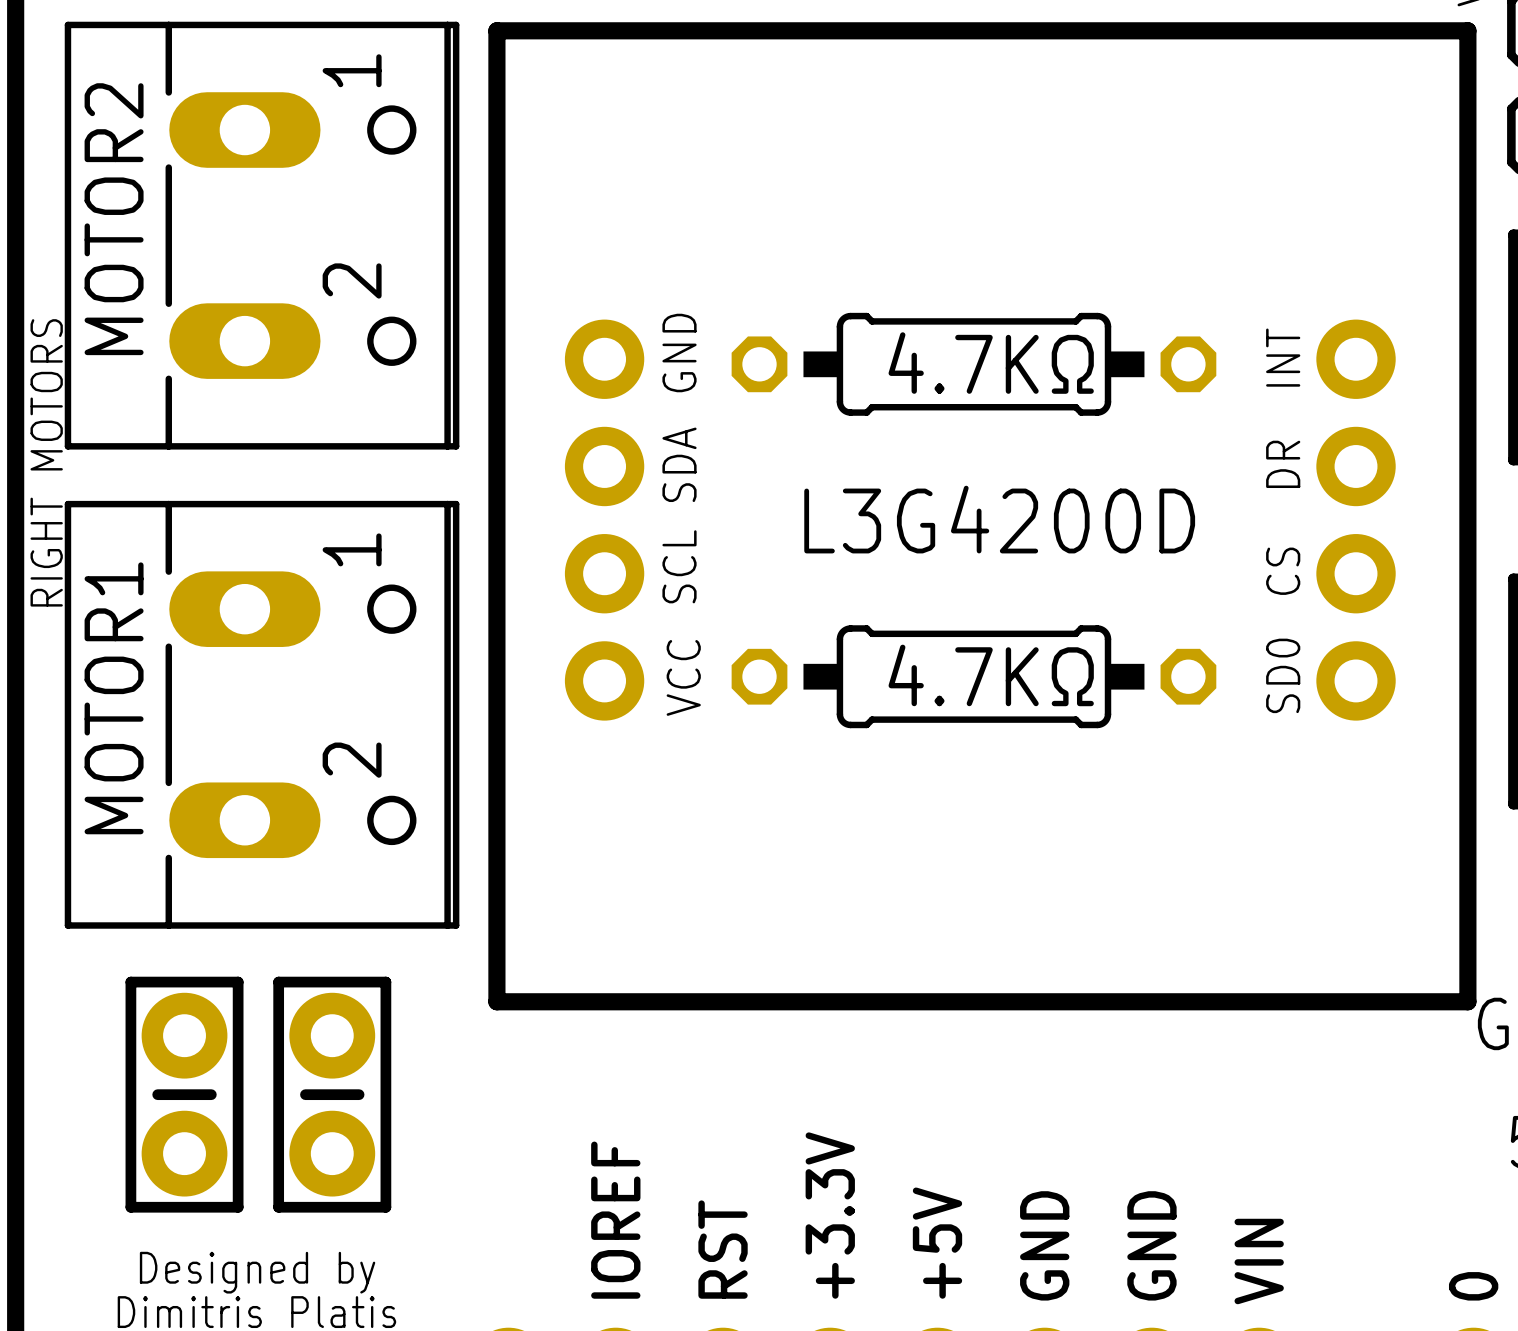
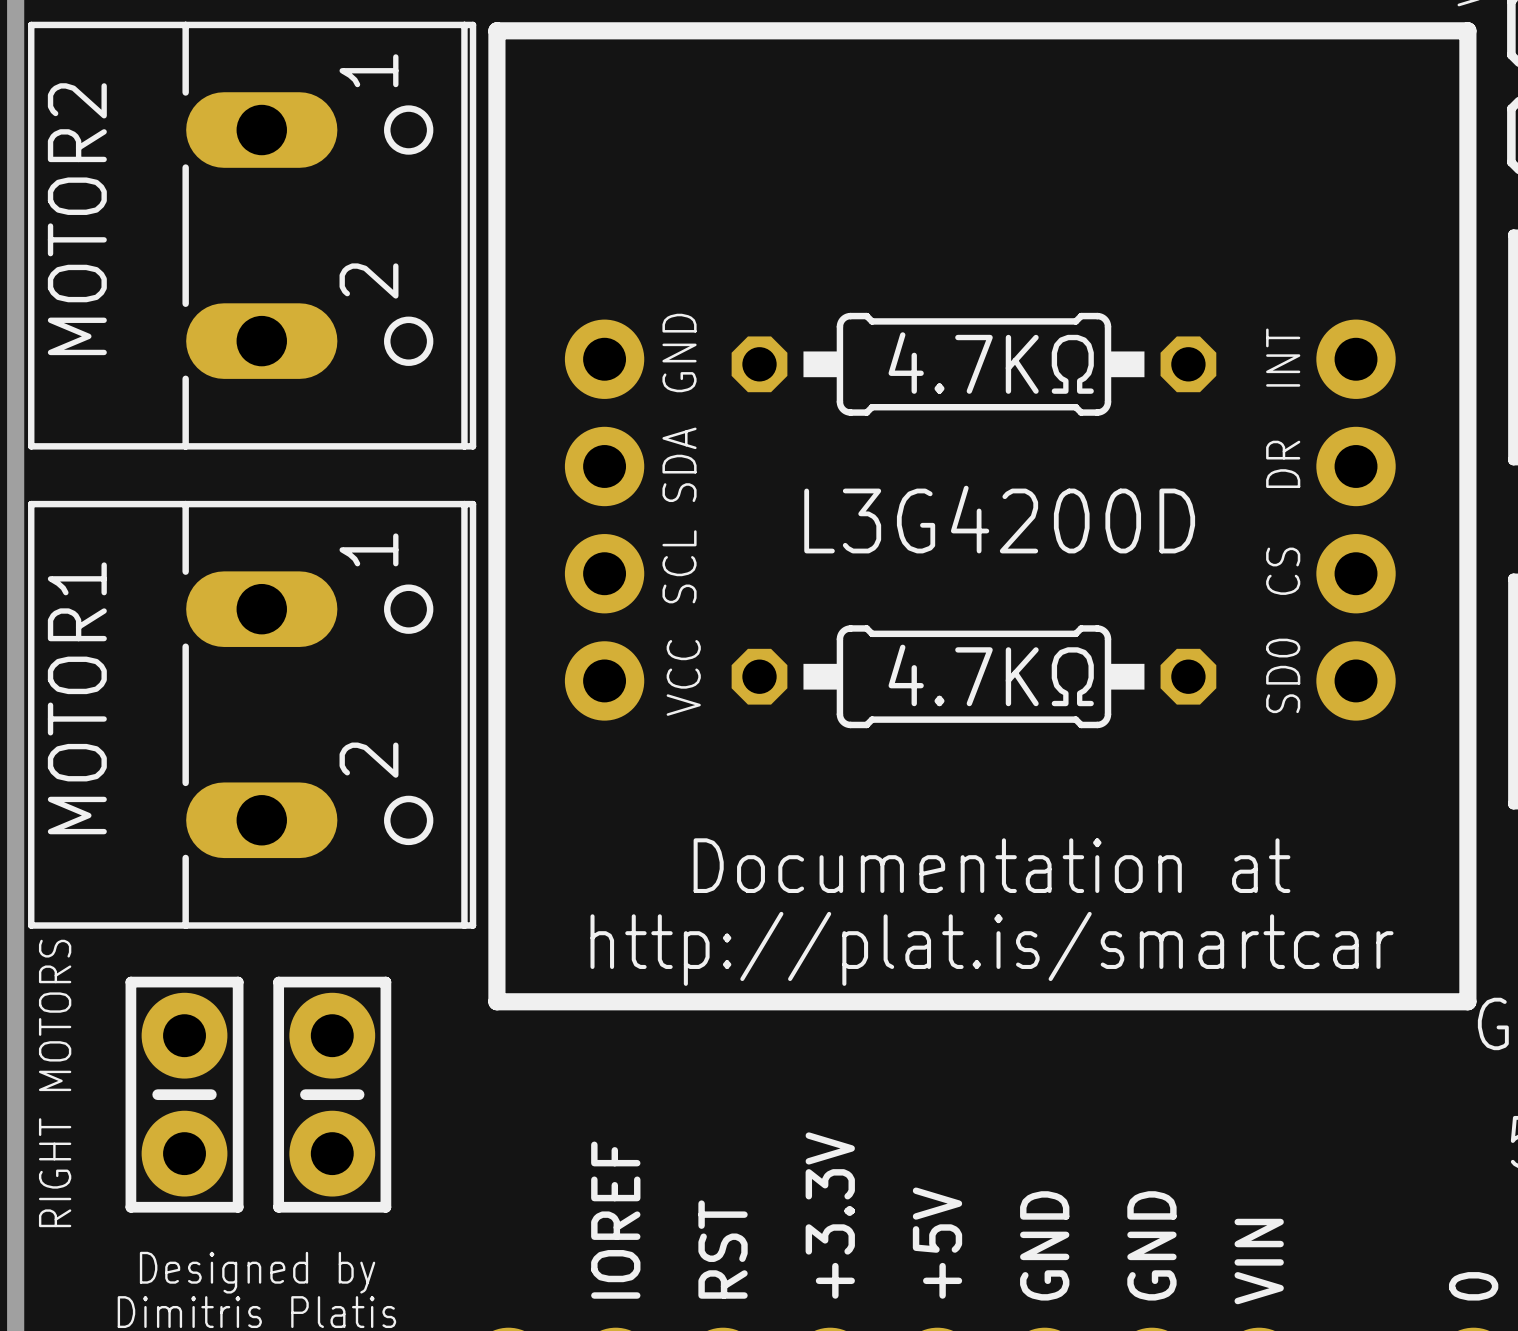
MOTOR2 footprint: [64, 21, 460, 450] -> [28, 21, 477, 450]
text position: RIGHT MOTORS (46, 462) -> RIGHT MOTORS (55, 1083)
MOTOR1 footprint: [64, 500, 460, 929] -> [28, 500, 477, 929]
text: none -> Documentation at (991, 865)
text: none -> http://plat.is/smartcar (991, 948)

